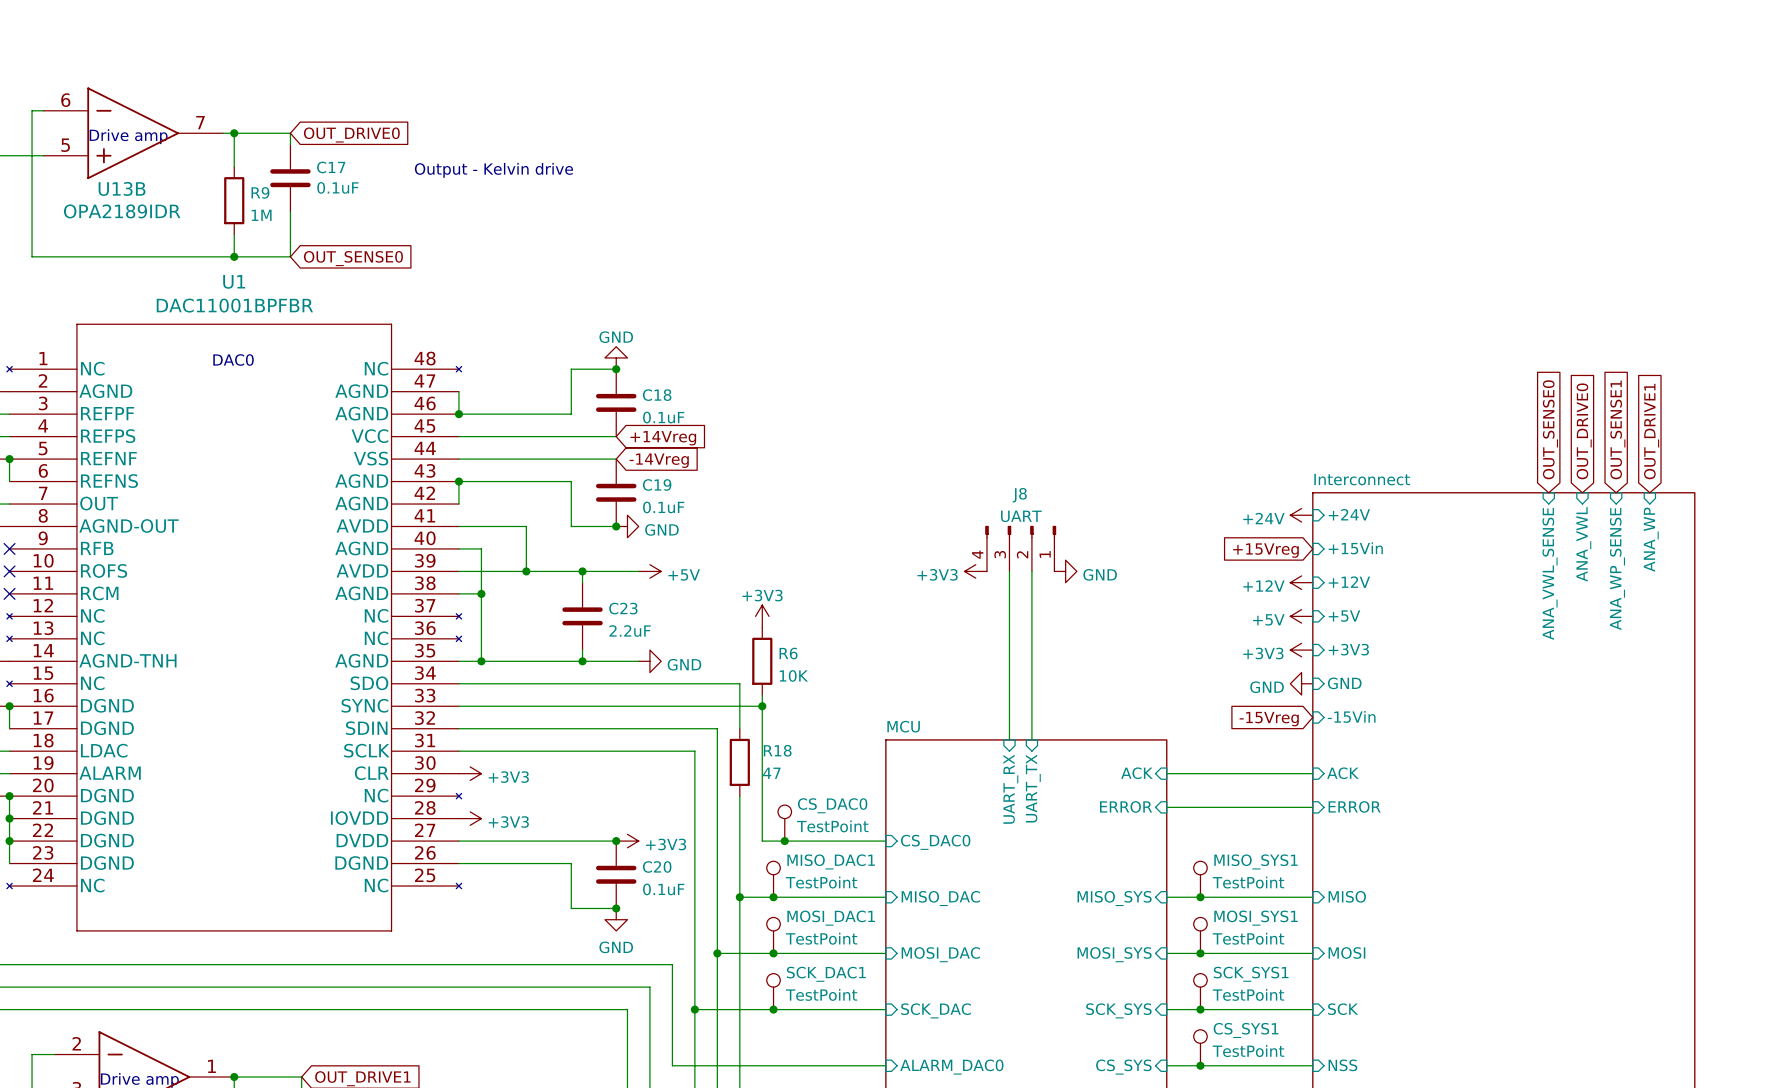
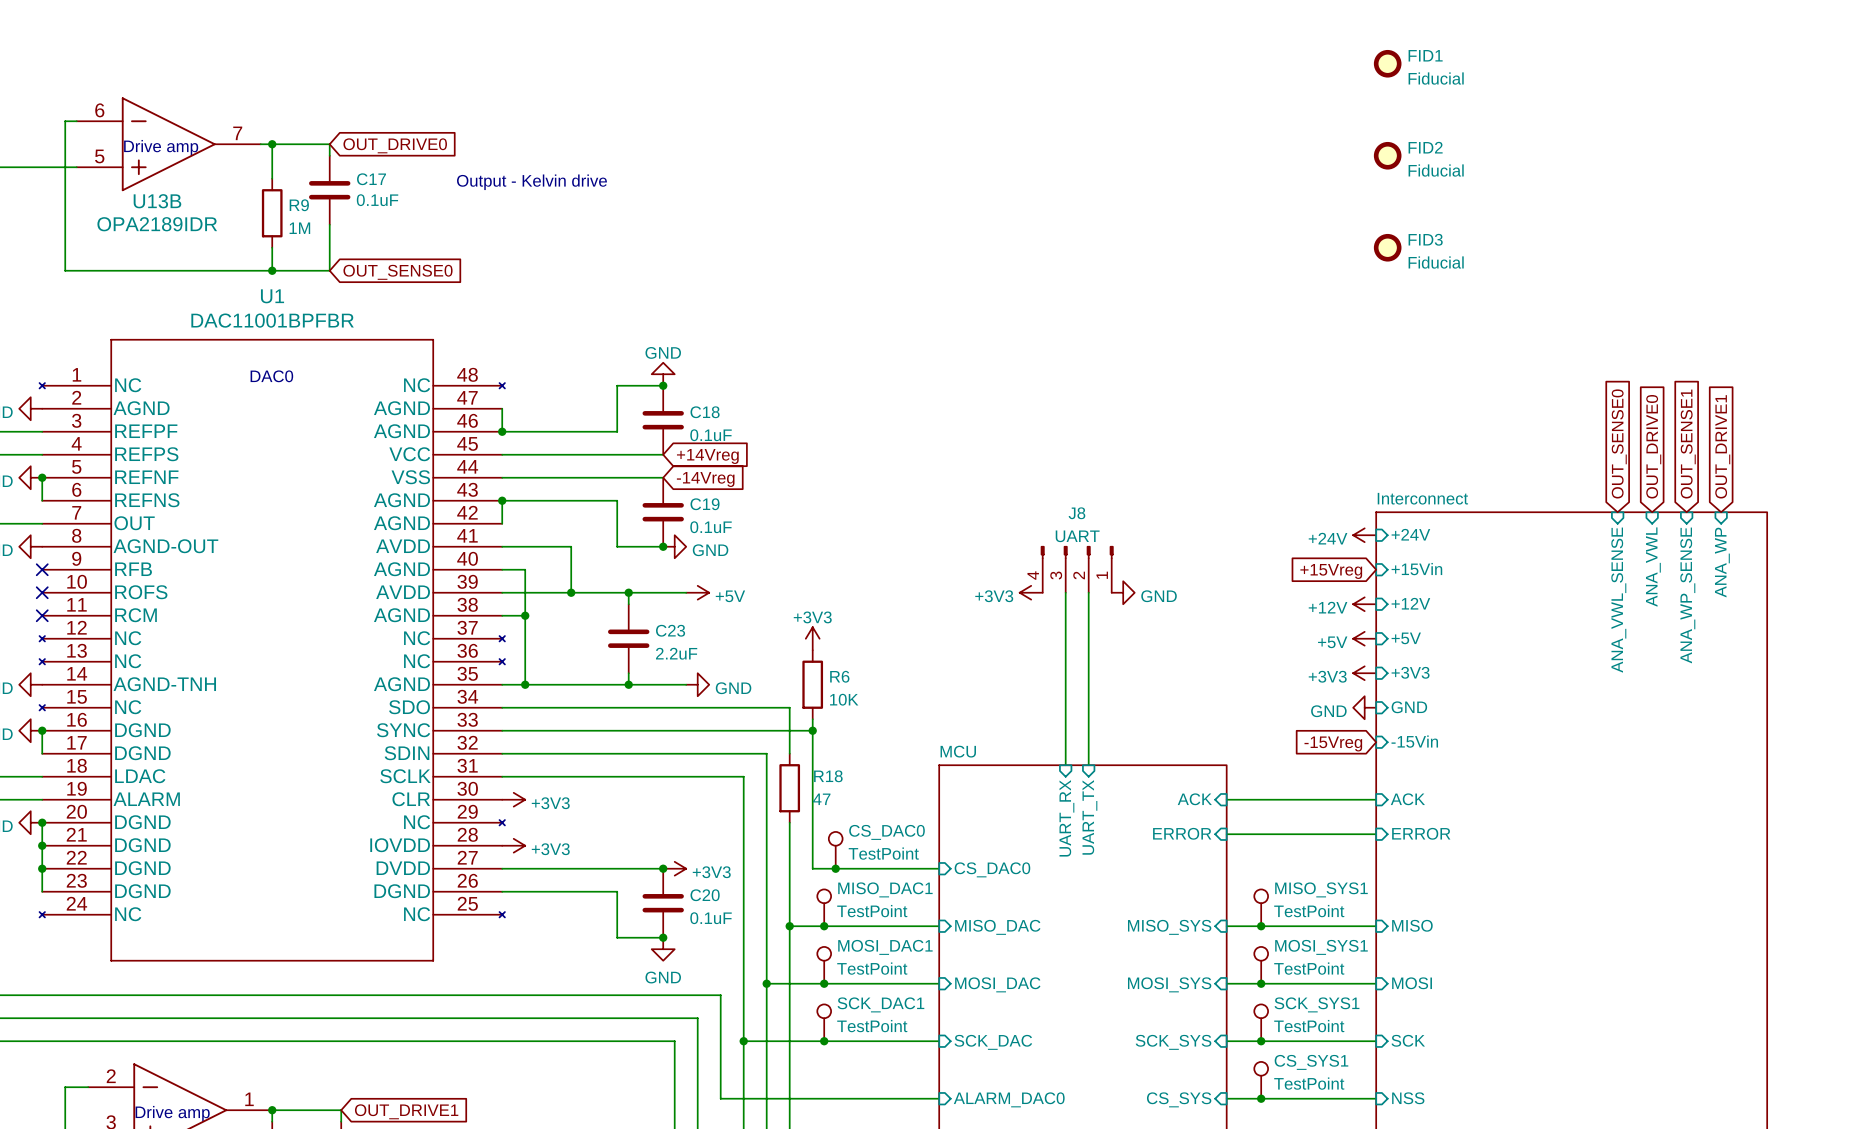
FID1: none -> Fiducial (1387, 63)
FID2: none -> Fiducial (1387, 155)
FID3: none -> Fiducial (1387, 247)

